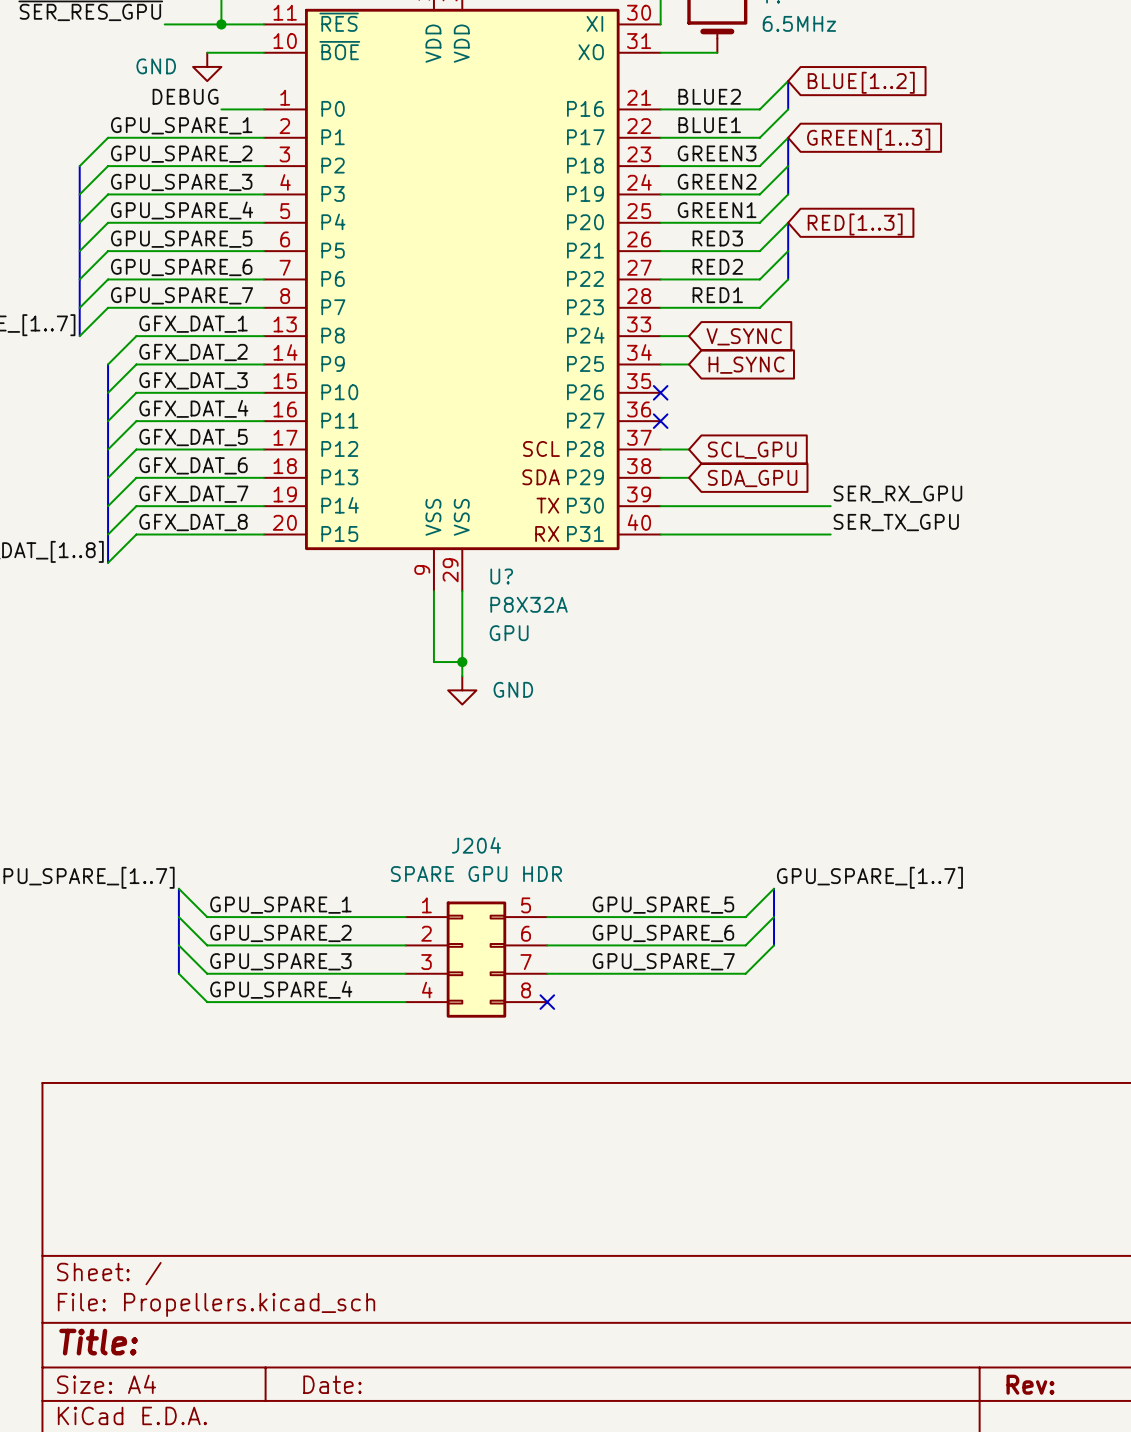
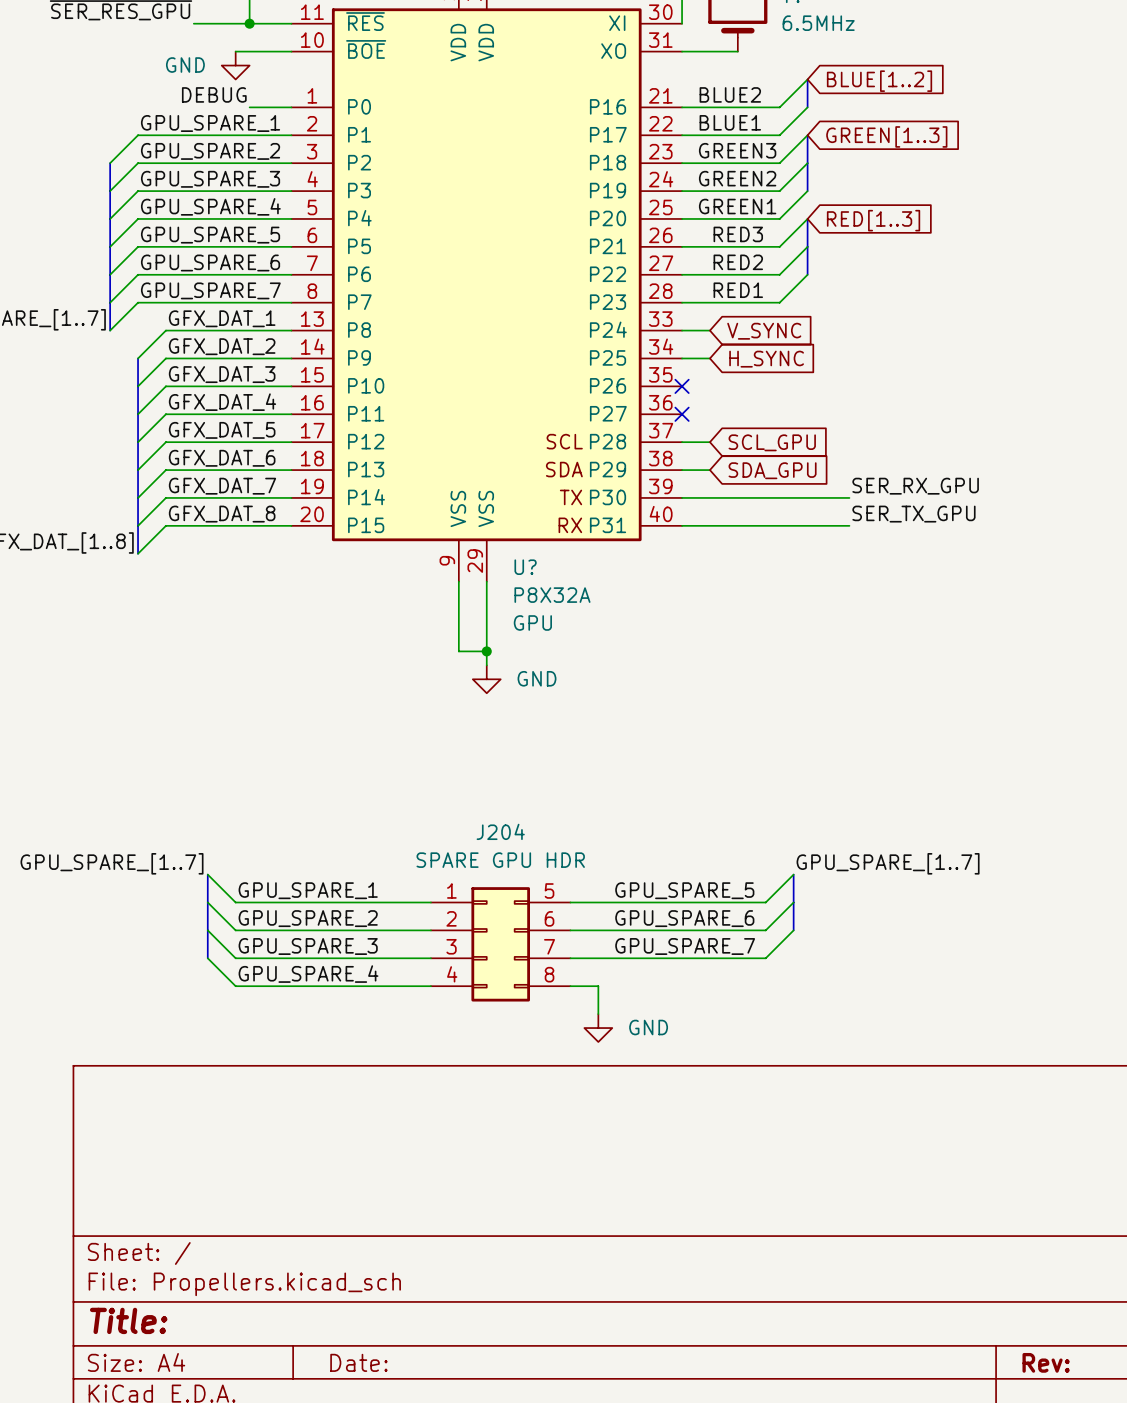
wire: none -> (570, 986) (598, 986) (598, 1014)
no-connect mark: (547, 1002) -> none
power symbol: none -> GND (598, 1028)

